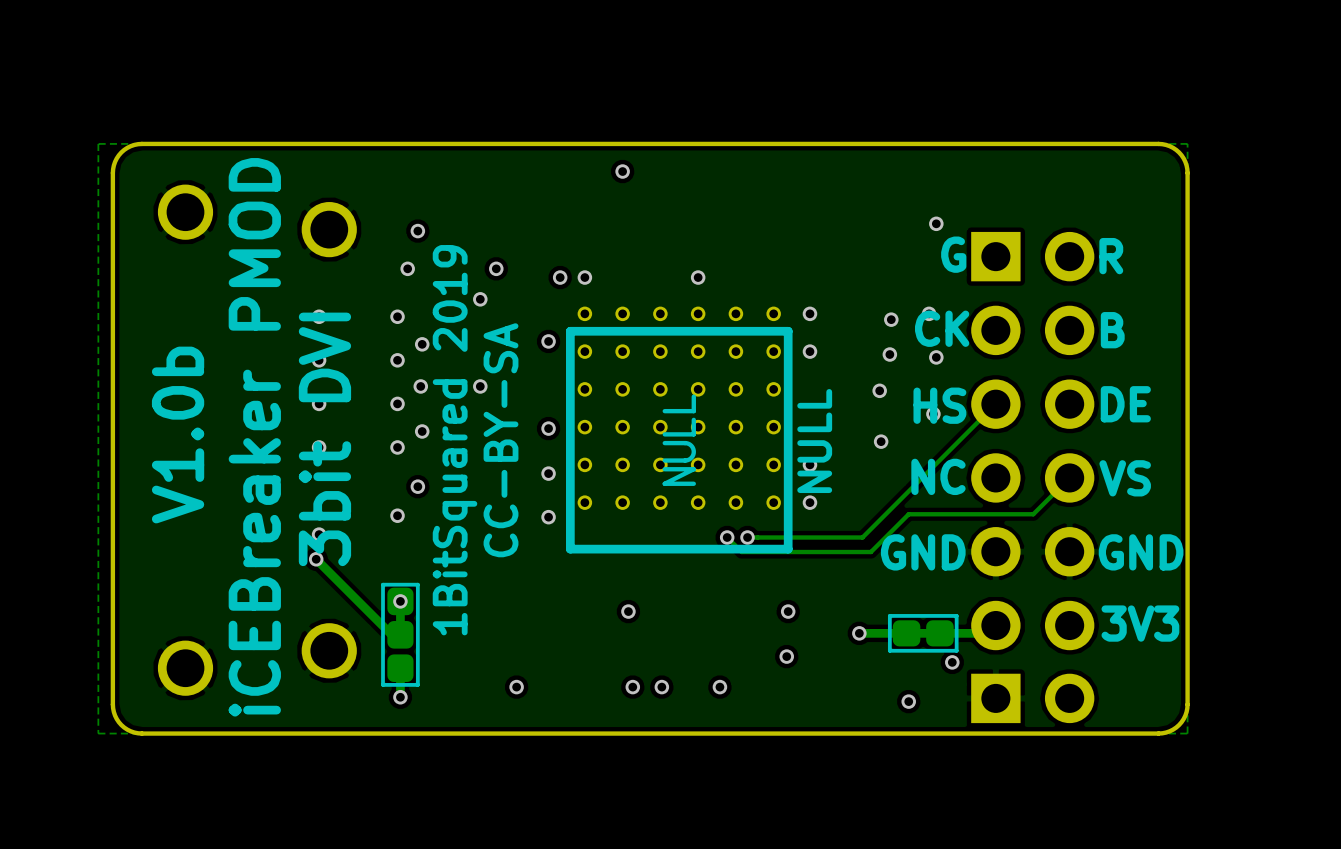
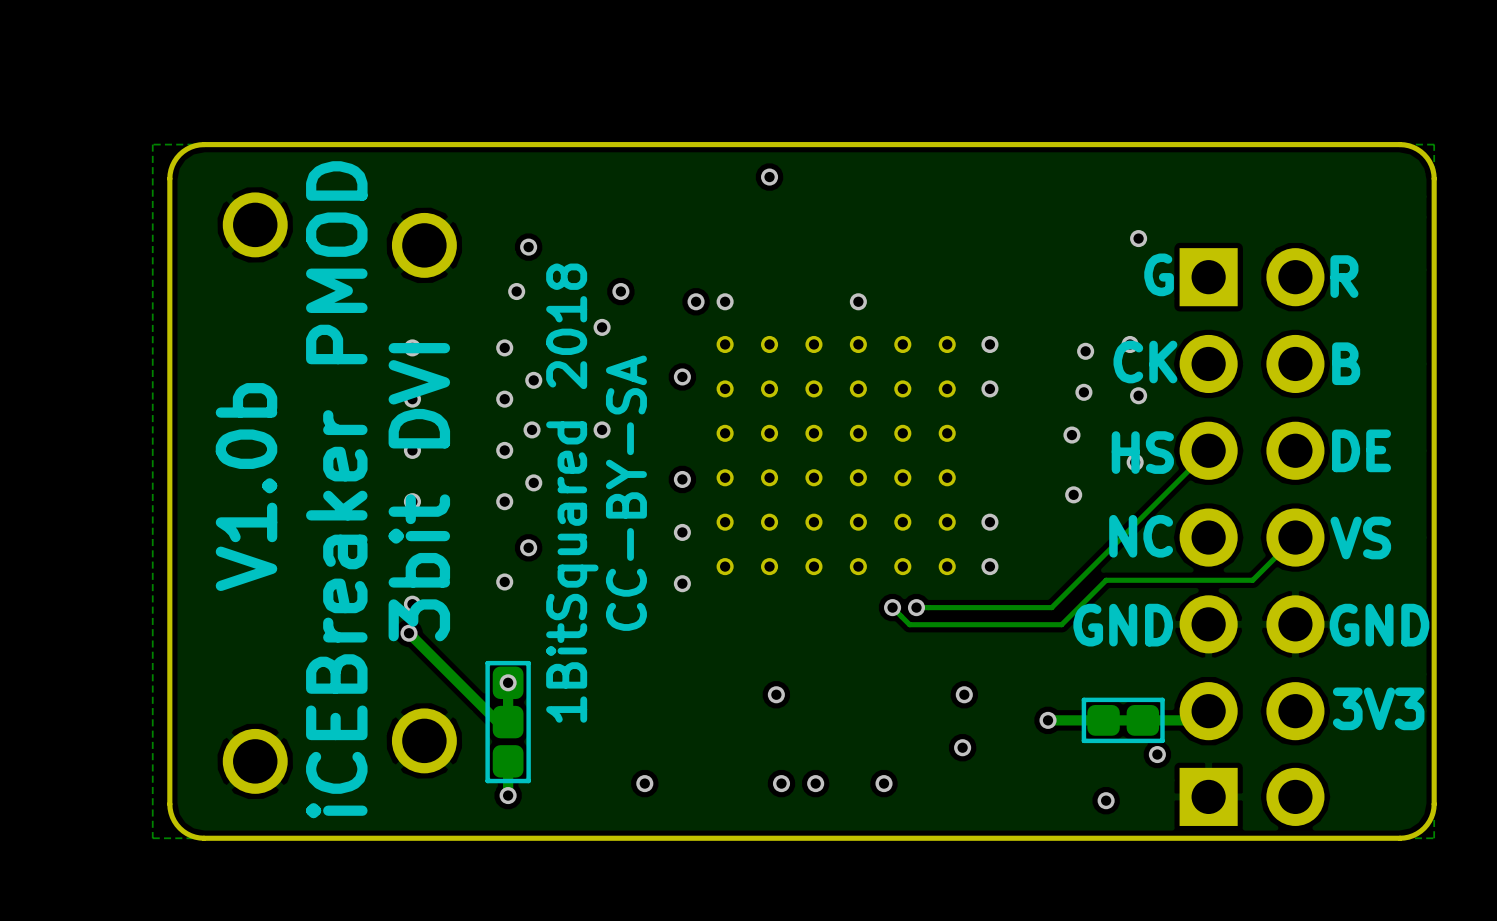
drawing: [565, 326, 793, 554] -> none
text: 1BitSquared 2019 (455, 440) -> 1BitSquared 2018 (572, 493)
text: NULL (814, 441) -> none

